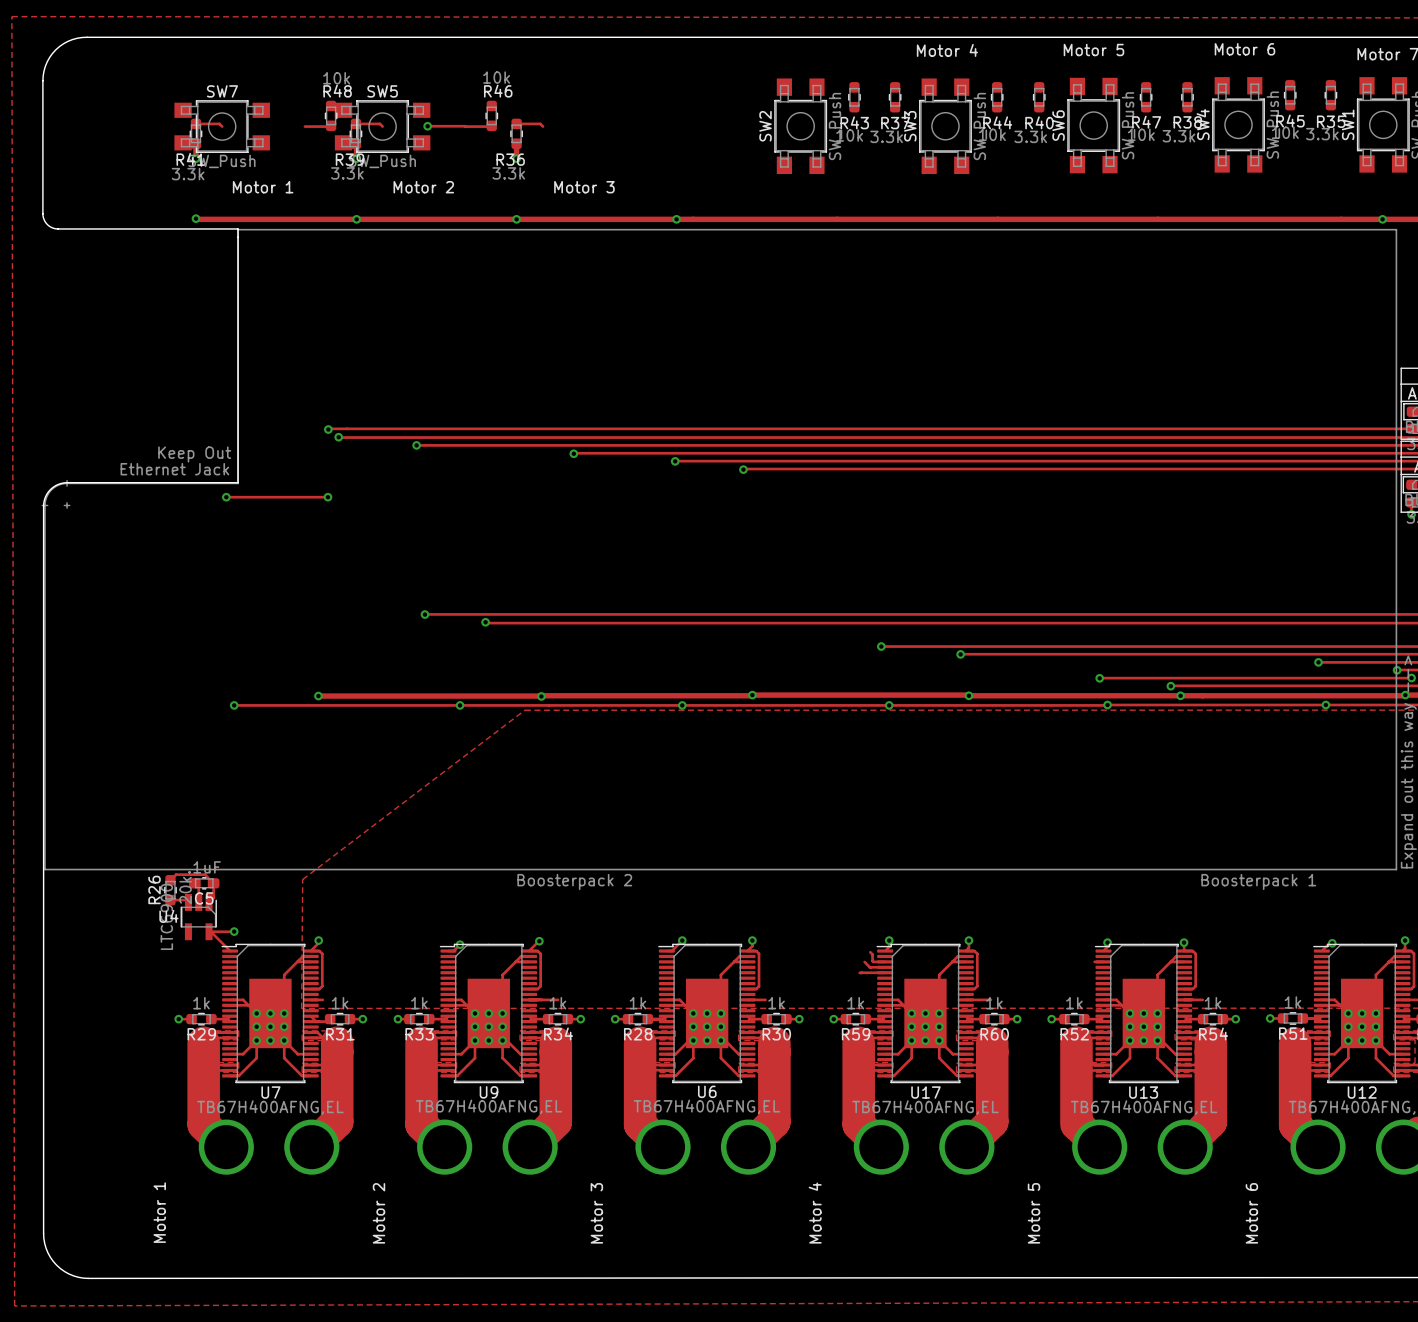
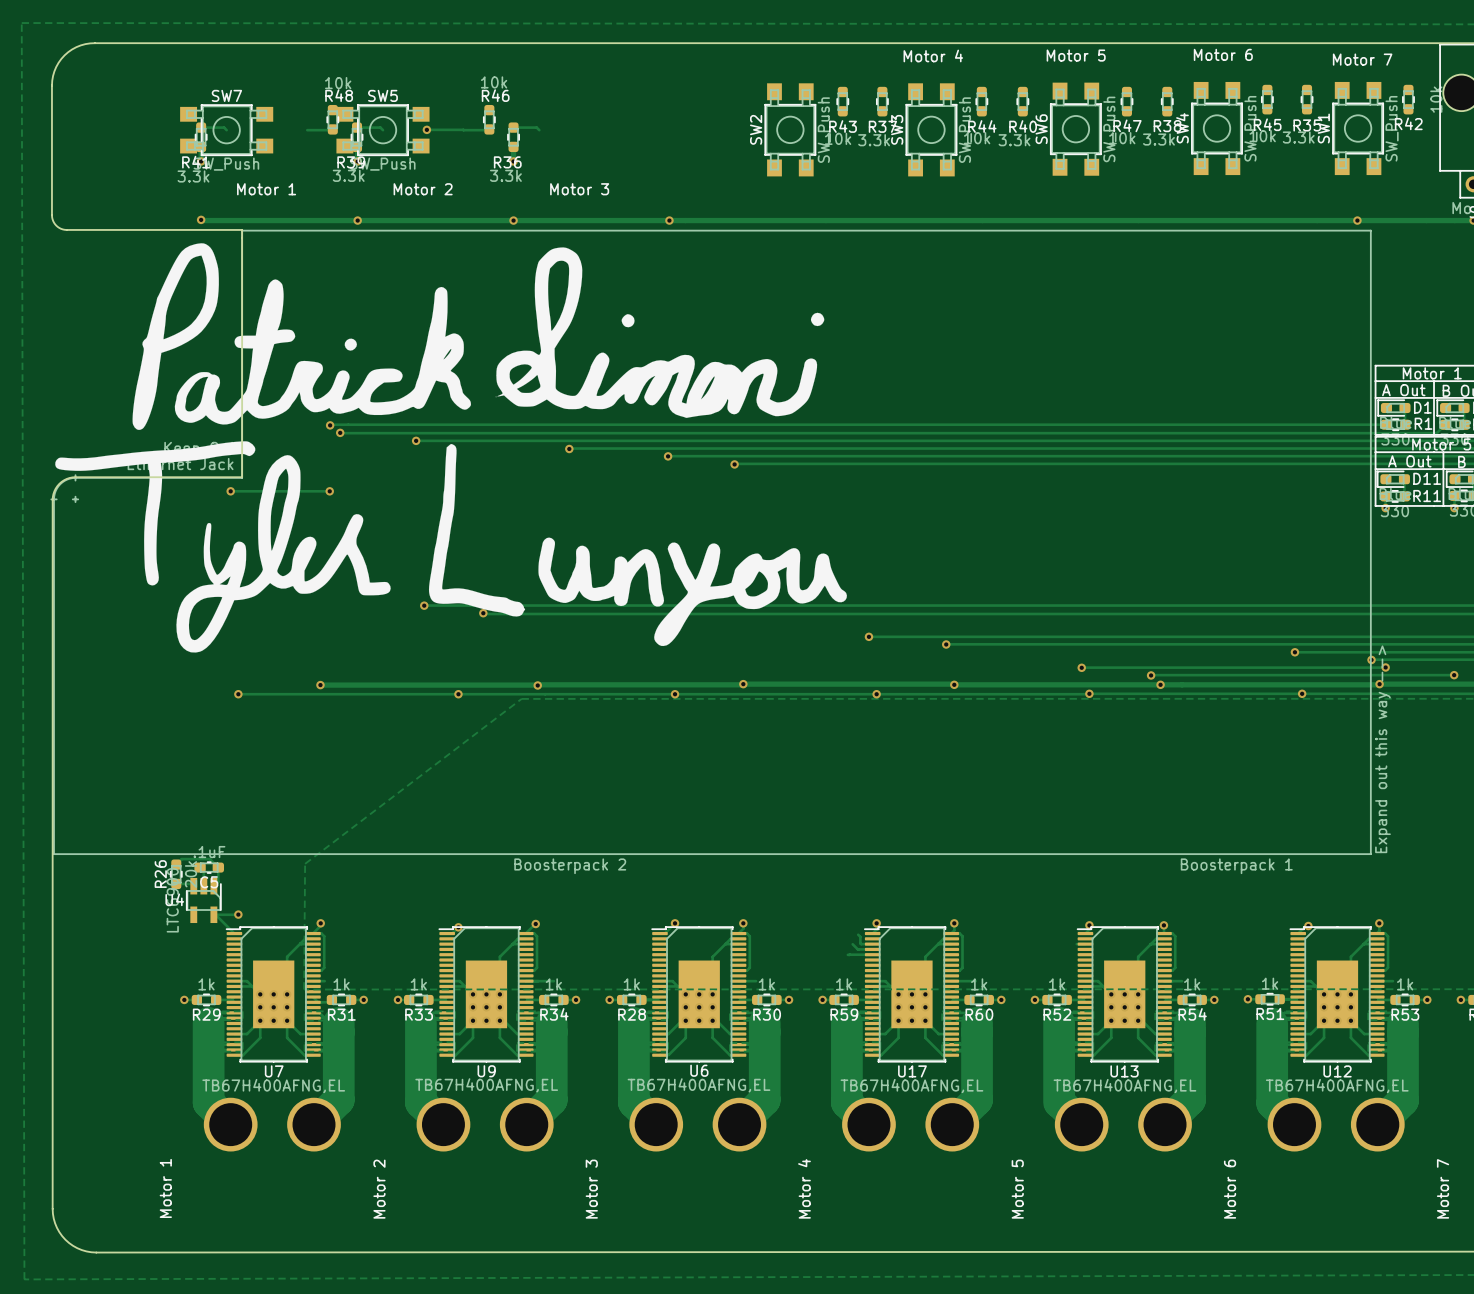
drawing: none -> [55, 243, 847, 653]

